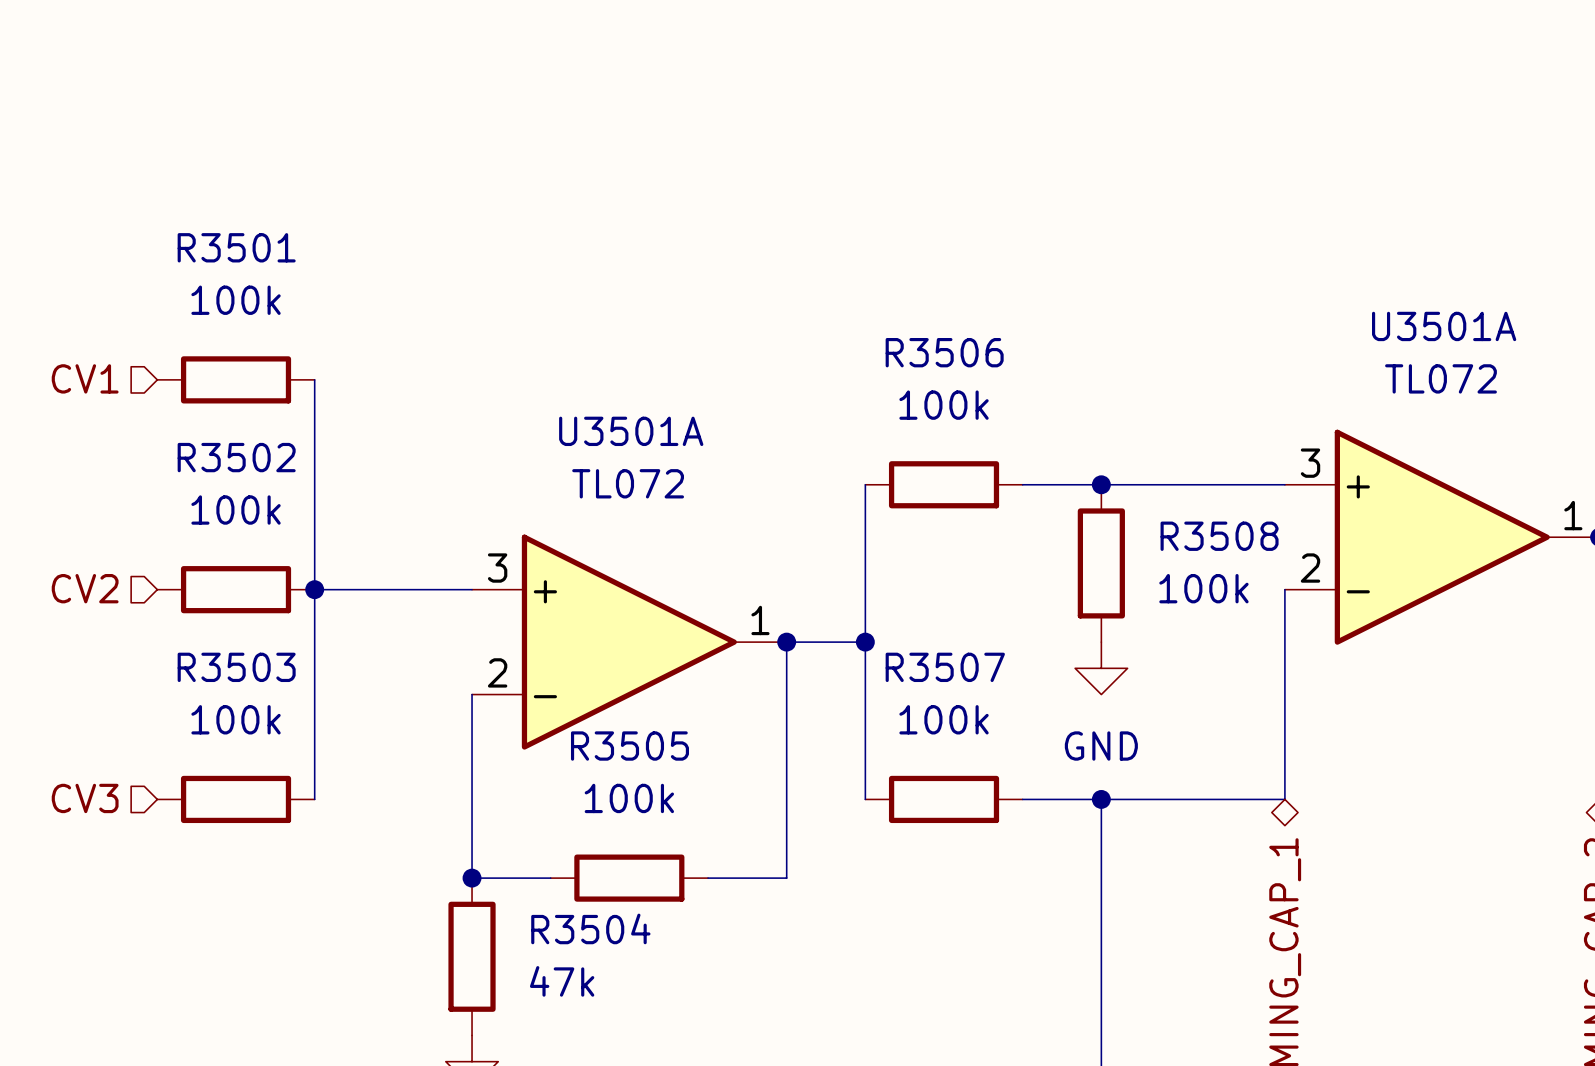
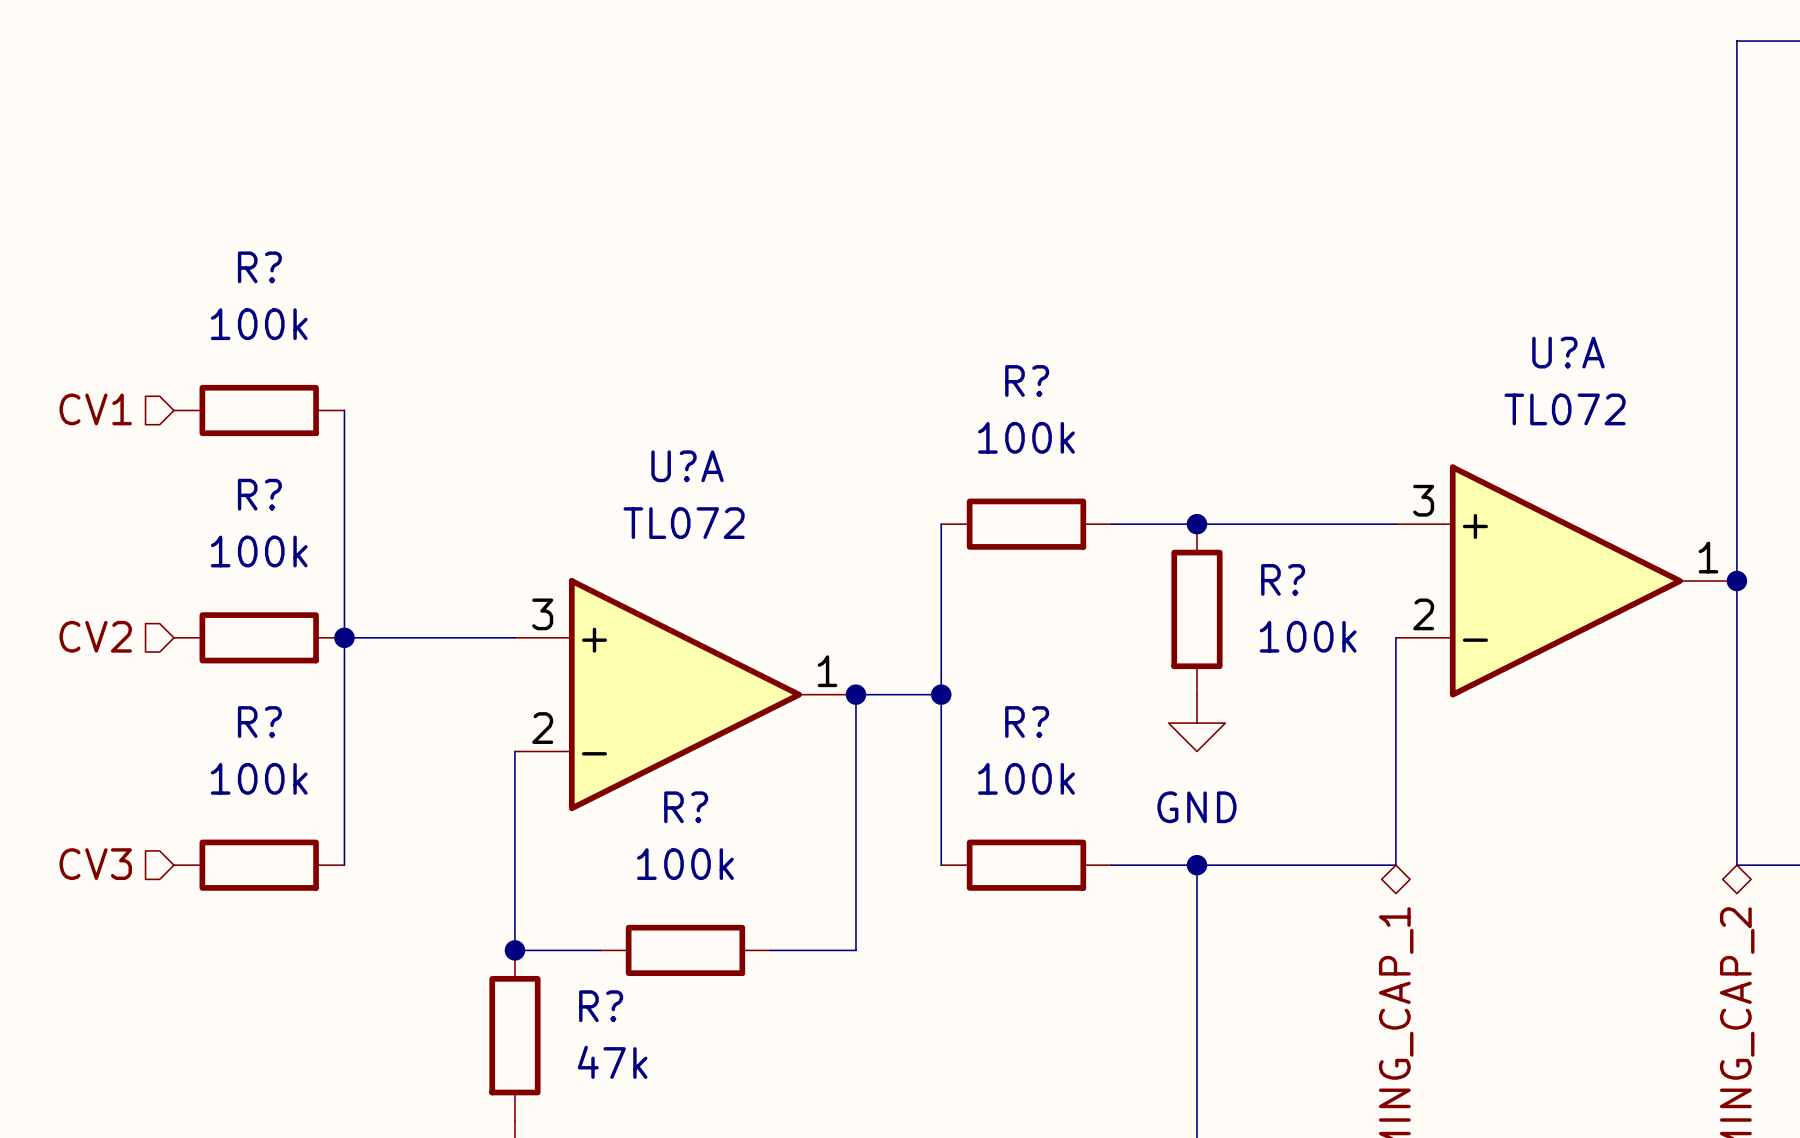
R3501 name: R3501 (236, 247) -> R? (259, 267)
U3501A name: U3501A (1444, 326) -> U?A (1568, 352)
R3506 name: R3506 (944, 352) -> R? (1027, 381)
U3501A name: U3501A (631, 431) -> U?A (687, 466)
R3502 name: R3502 (236, 457) -> R? (259, 494)
R3508 name: R3508 (1219, 536) -> R? (1283, 579)
R3503 name: R3503 (236, 667) -> R? (259, 722)
R3507 name: R3507 (945, 667) -> R? (1027, 722)
R3505 name: R3505 (629, 746) -> R? (686, 807)
R3504 name: R3504 (590, 928) -> R? (601, 1006)

